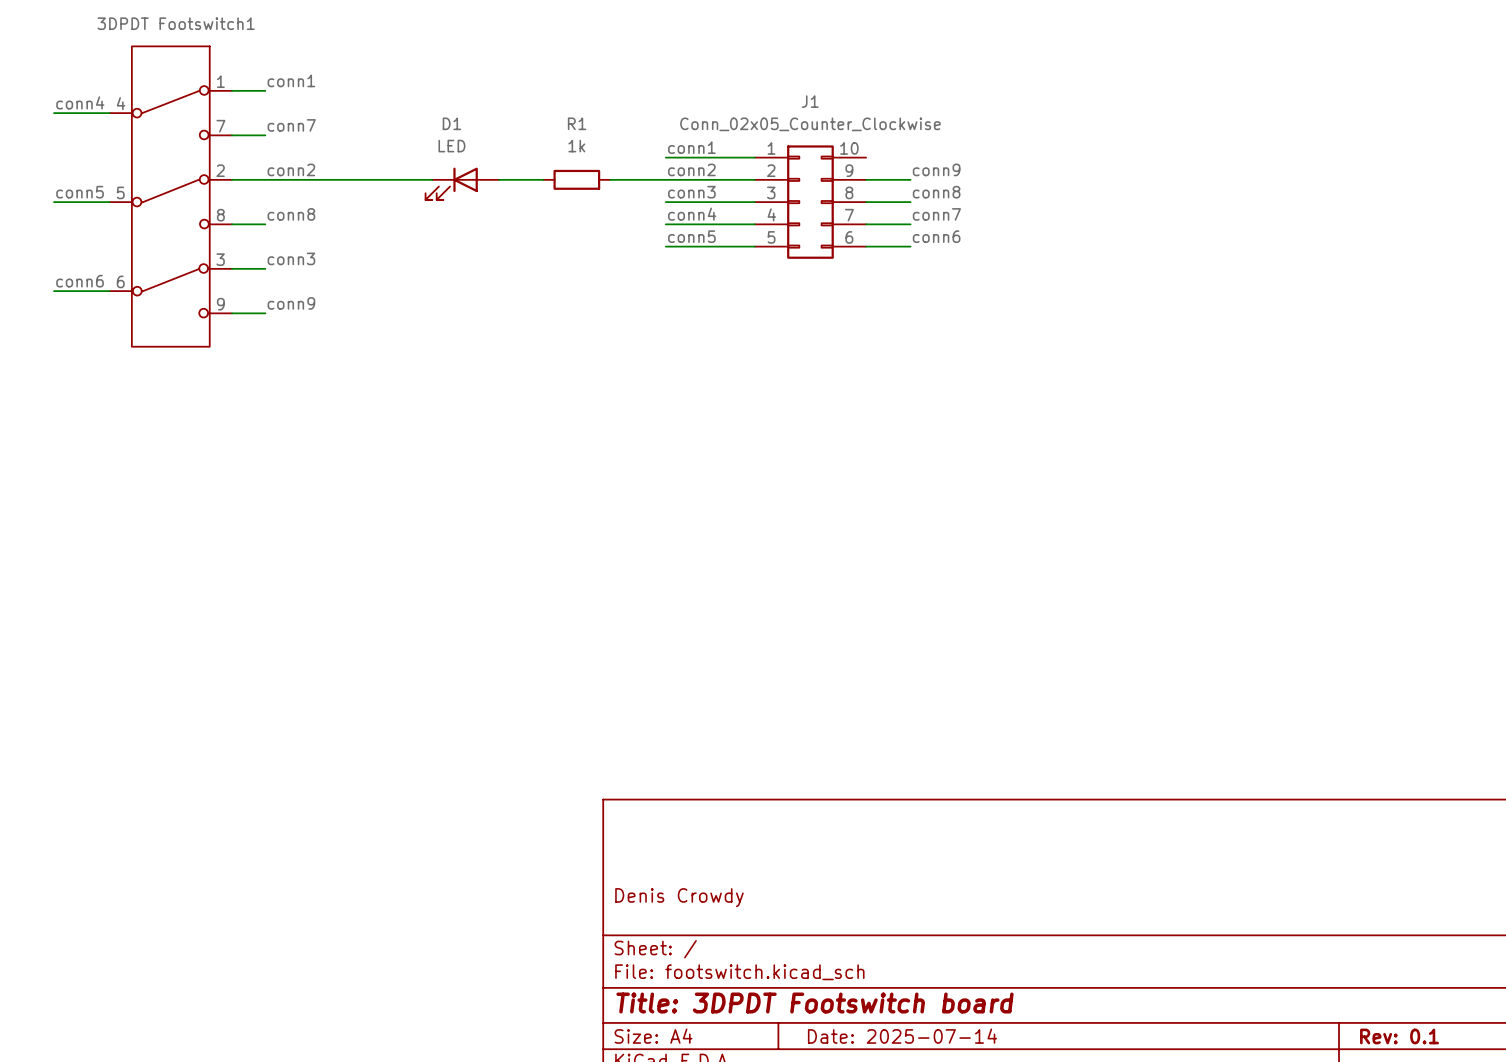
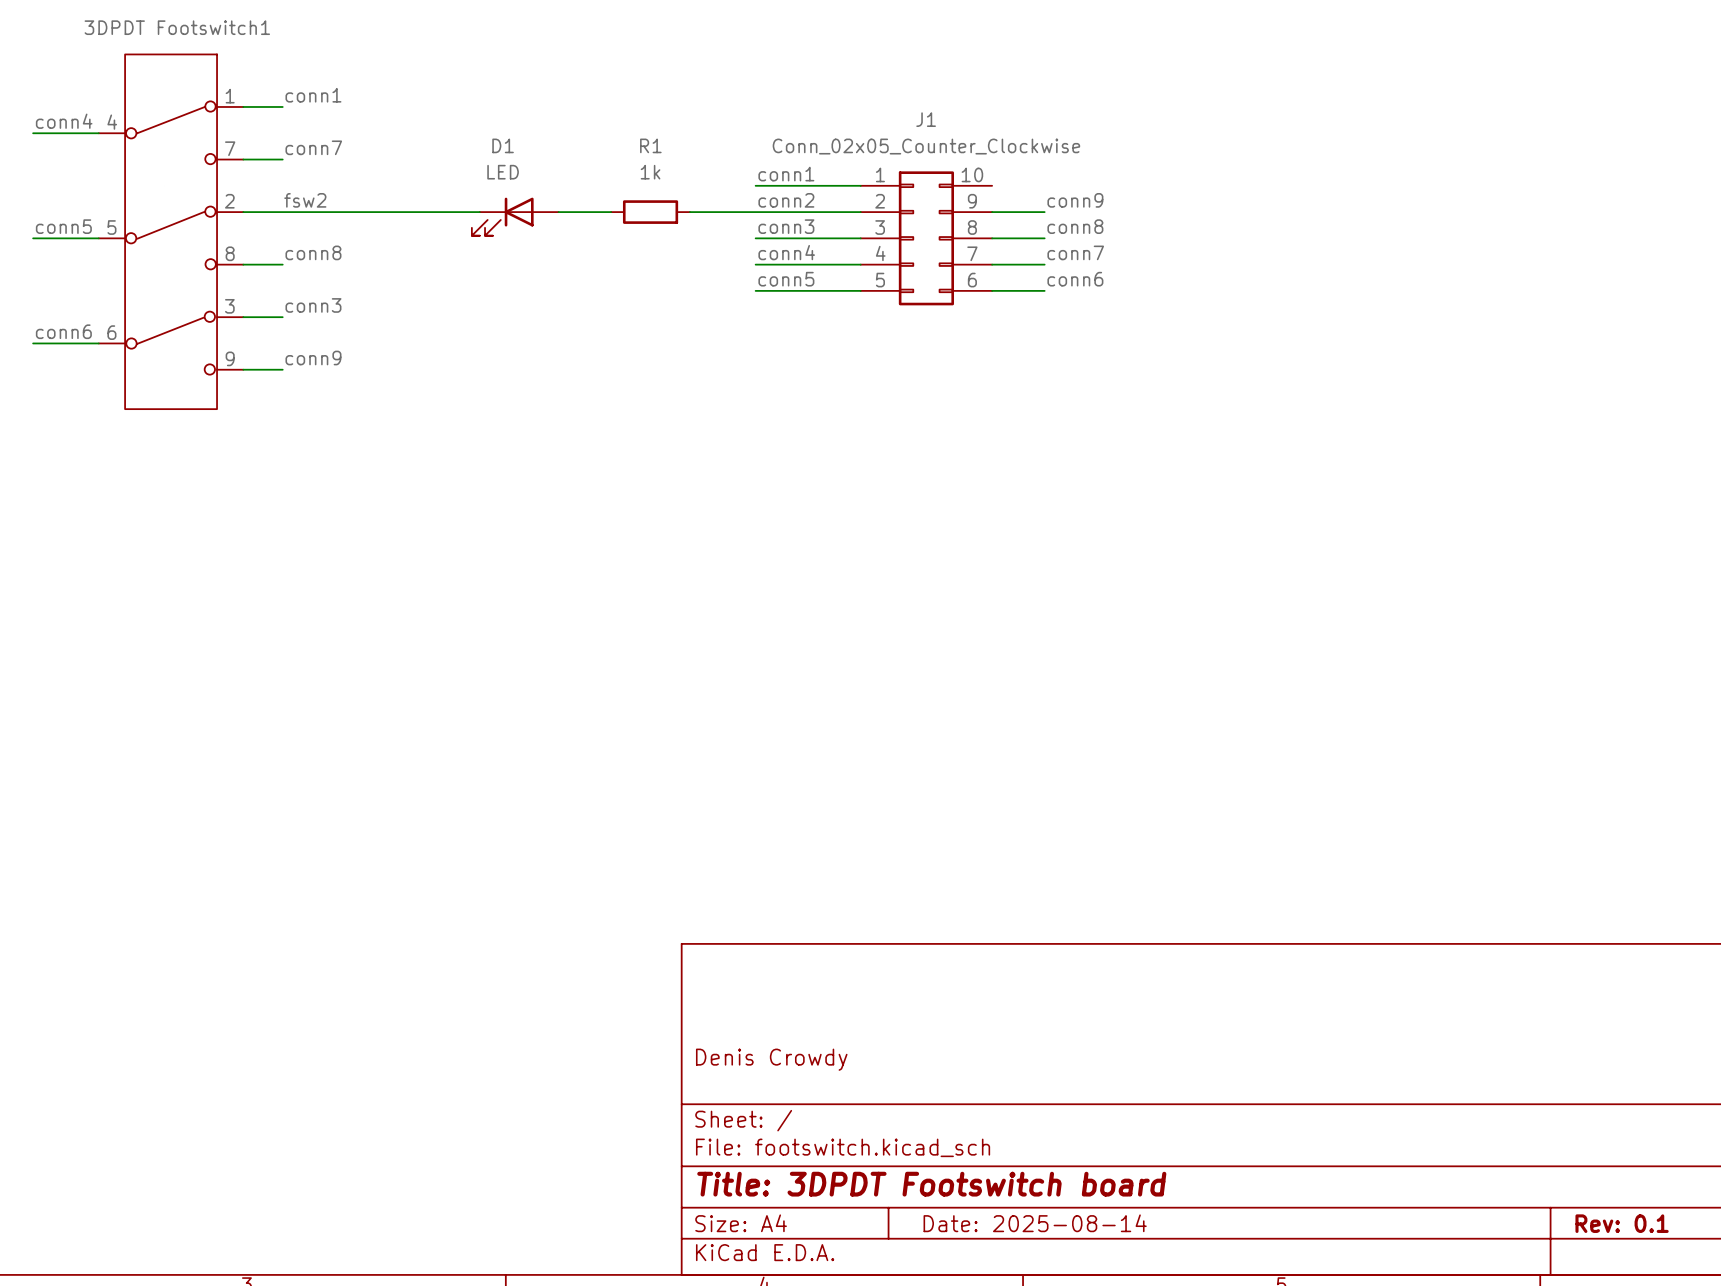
label: conn2 (291, 169) -> fsw2 (305, 200)
title block: Date: 2025-07-14 (902, 1036) -> Date: 2025-08-14 (1035, 1223)

